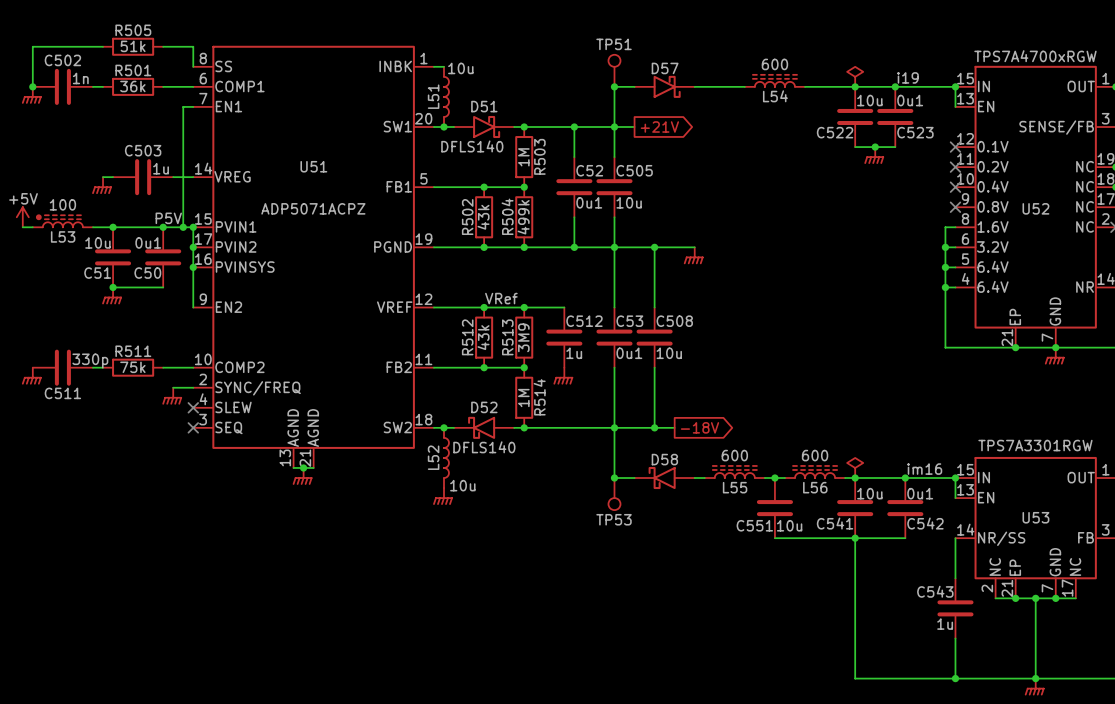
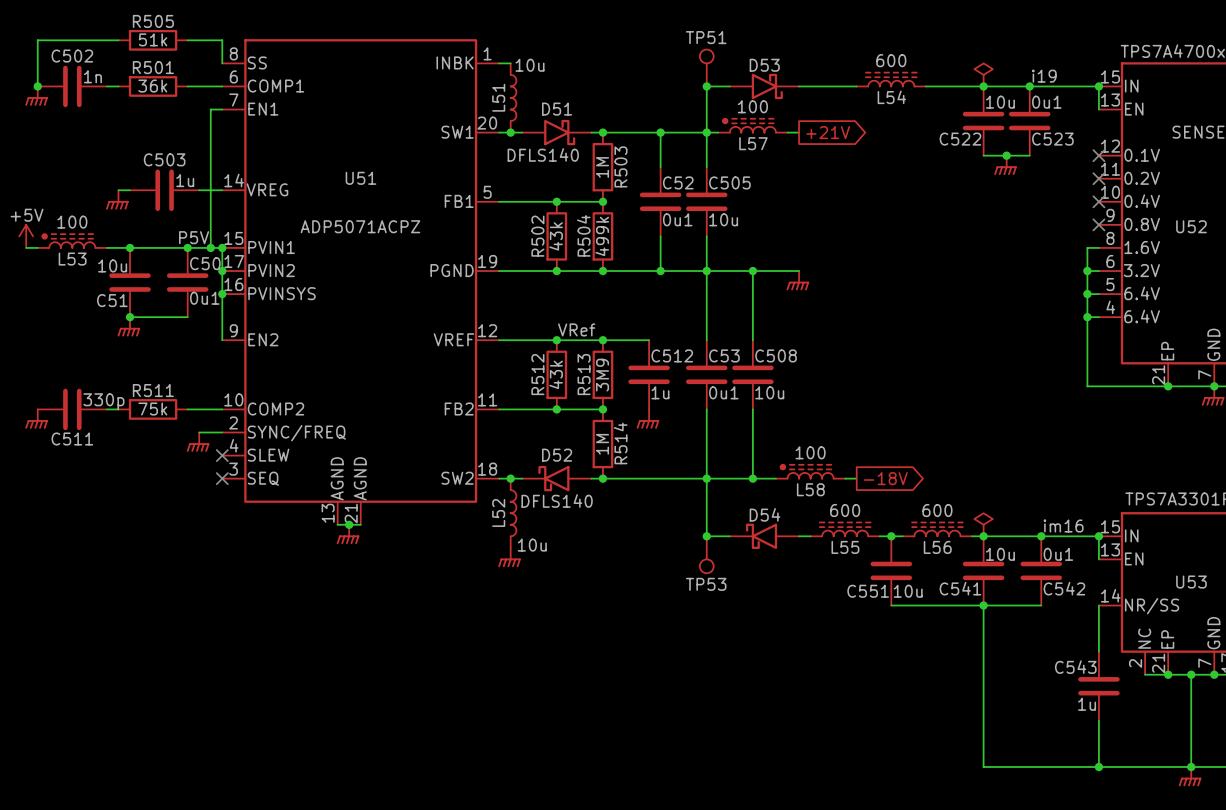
D57 name: D57 (665, 68) -> D53 (764, 65)
L57: none -> 100 (752, 125)
global label position: +21V (659, 127) -> +21V (828, 132)
C50 value position: 0u1 (148, 242) -> 0u1 (204, 298)
C50 name position: C50 (147, 273) -> C50 (205, 263)
L58: none -> 100 (810, 471)
global label position: -18V (699, 427) -> -18V (885, 478)
wire: none -> (845, 478) (856, 478)
D58 name: D58 (664, 459) -> D54 (764, 514)

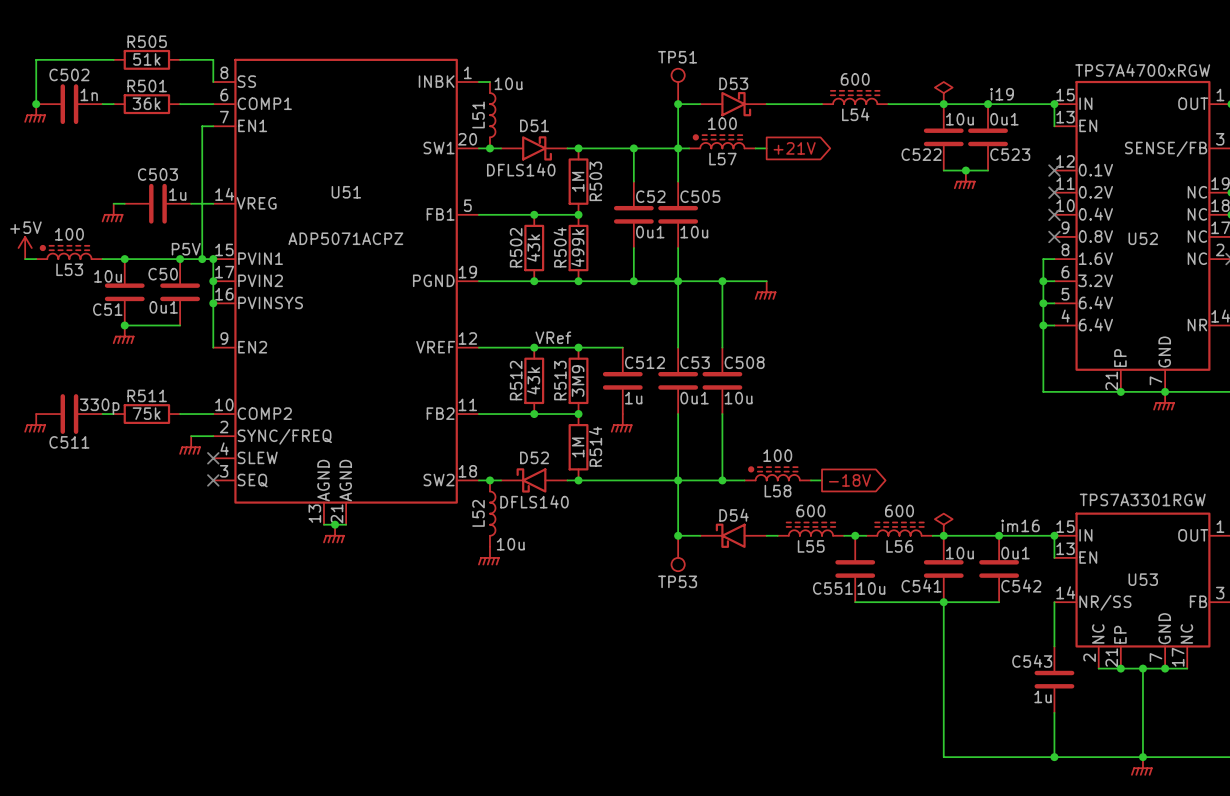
C50 name position: C50 (205, 263) -> C50 (163, 274)
C50 value position: 0u1 (204, 298) -> 0u1 (163, 307)

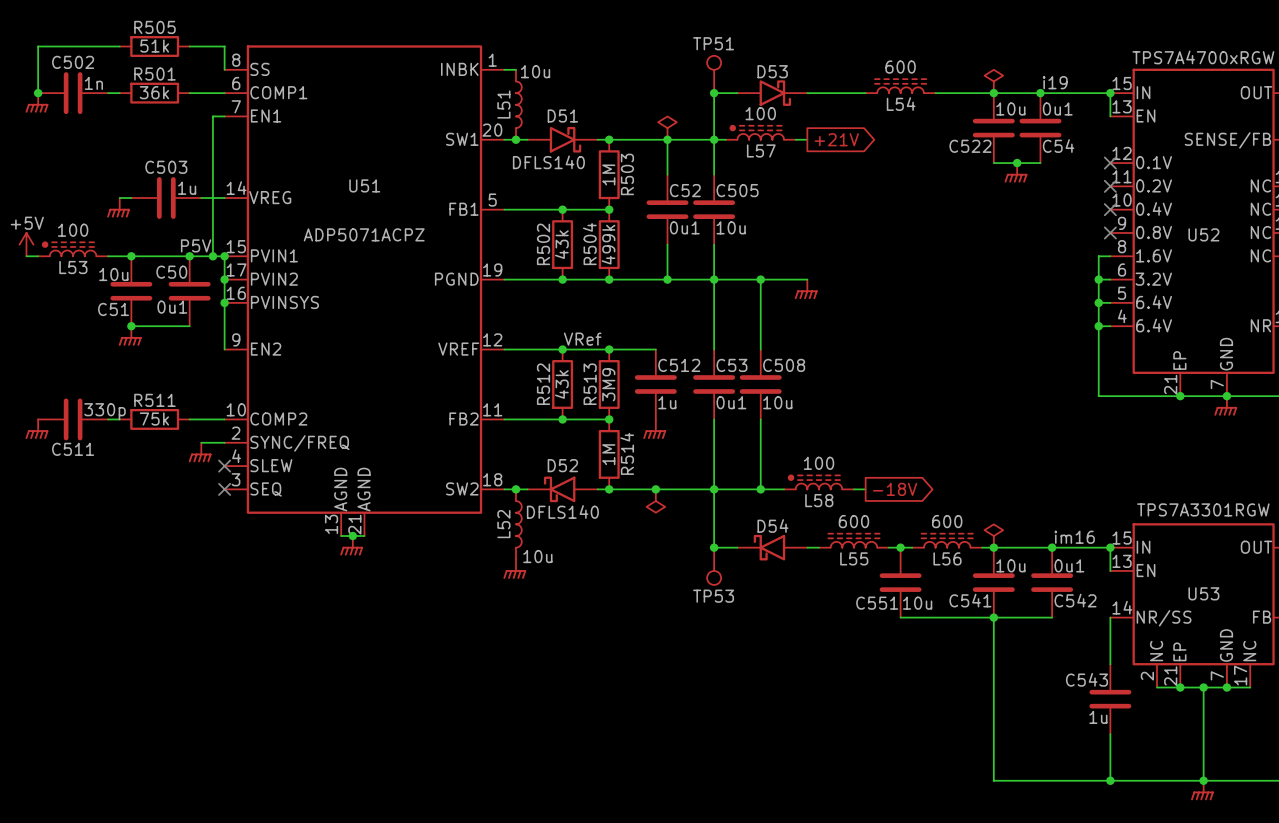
power symbol: none -> (667, 128)
C523 name: C523 (1010, 154) -> C54 (1058, 146)
junction: none -> (655, 489)
power symbol: none -> (655, 501)

